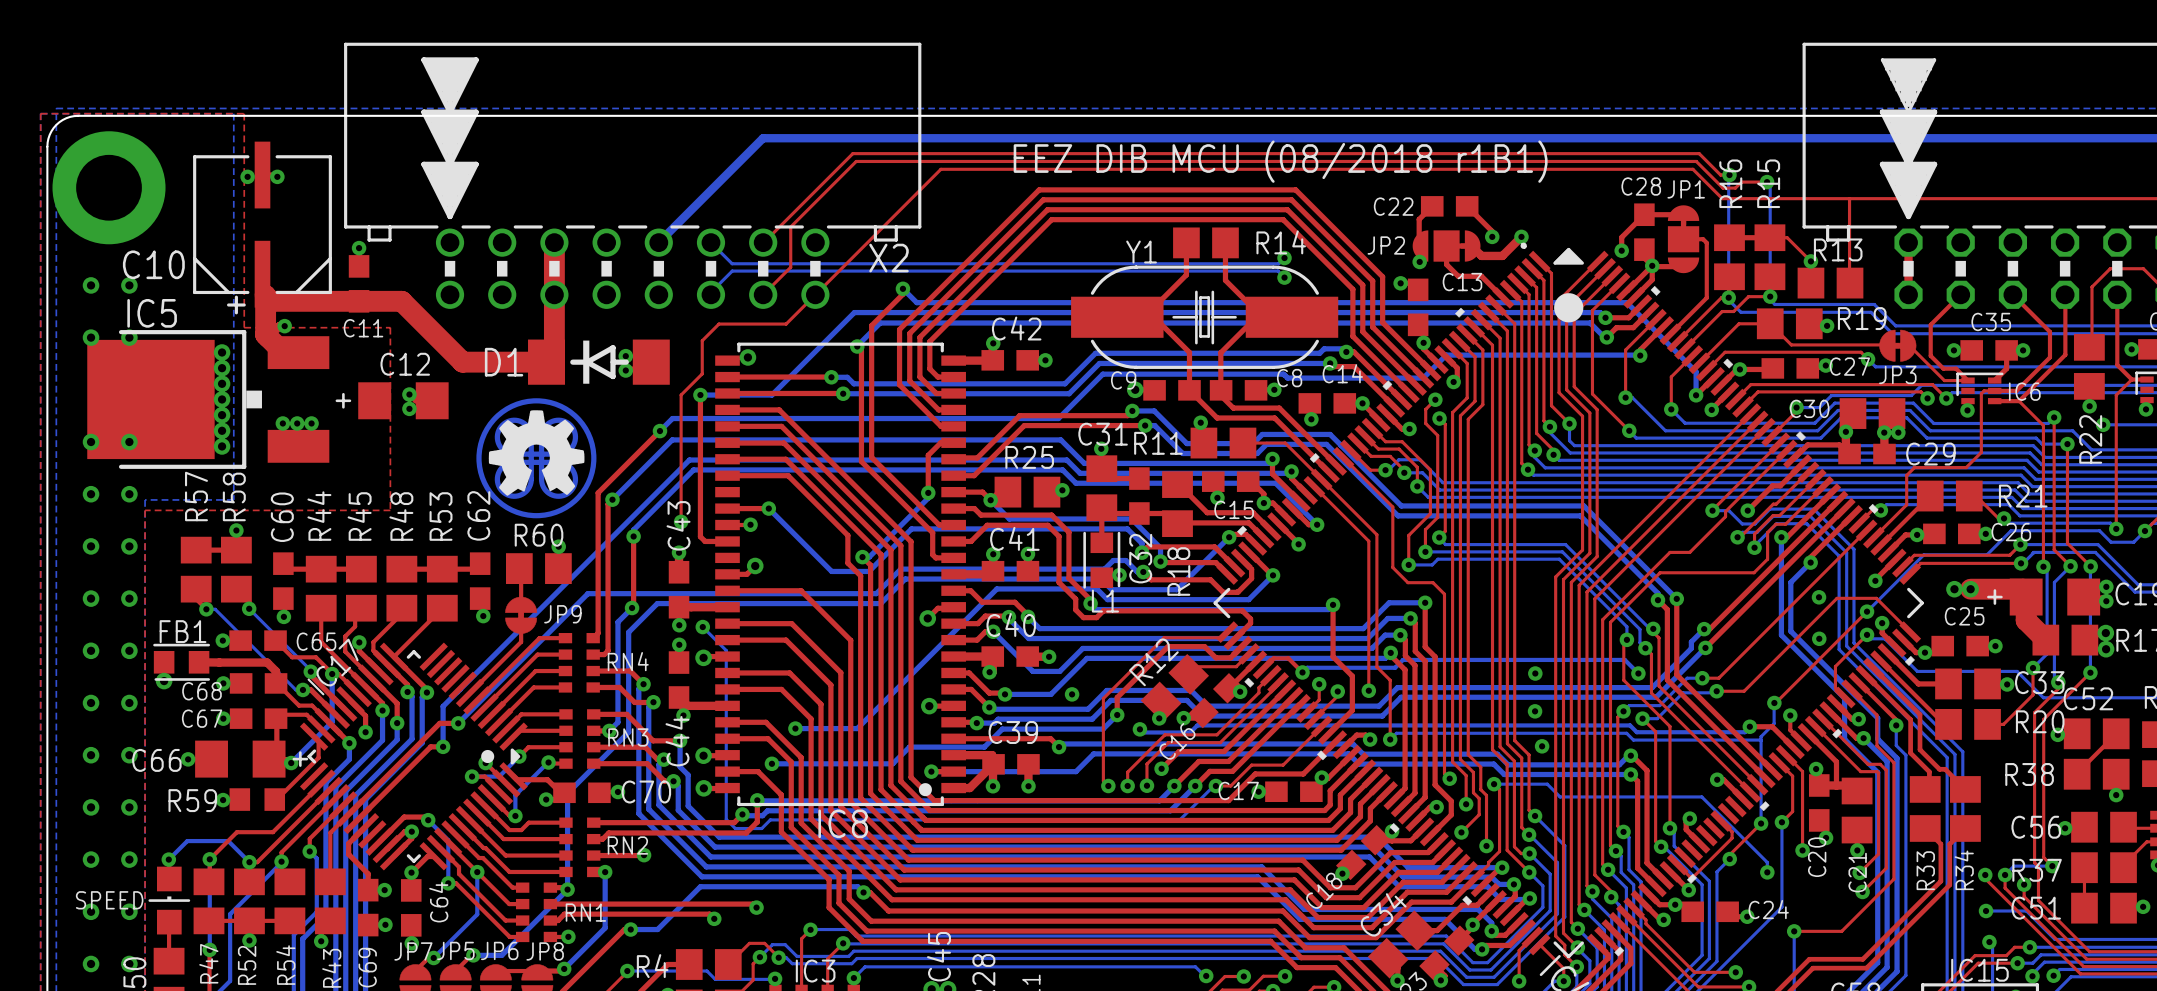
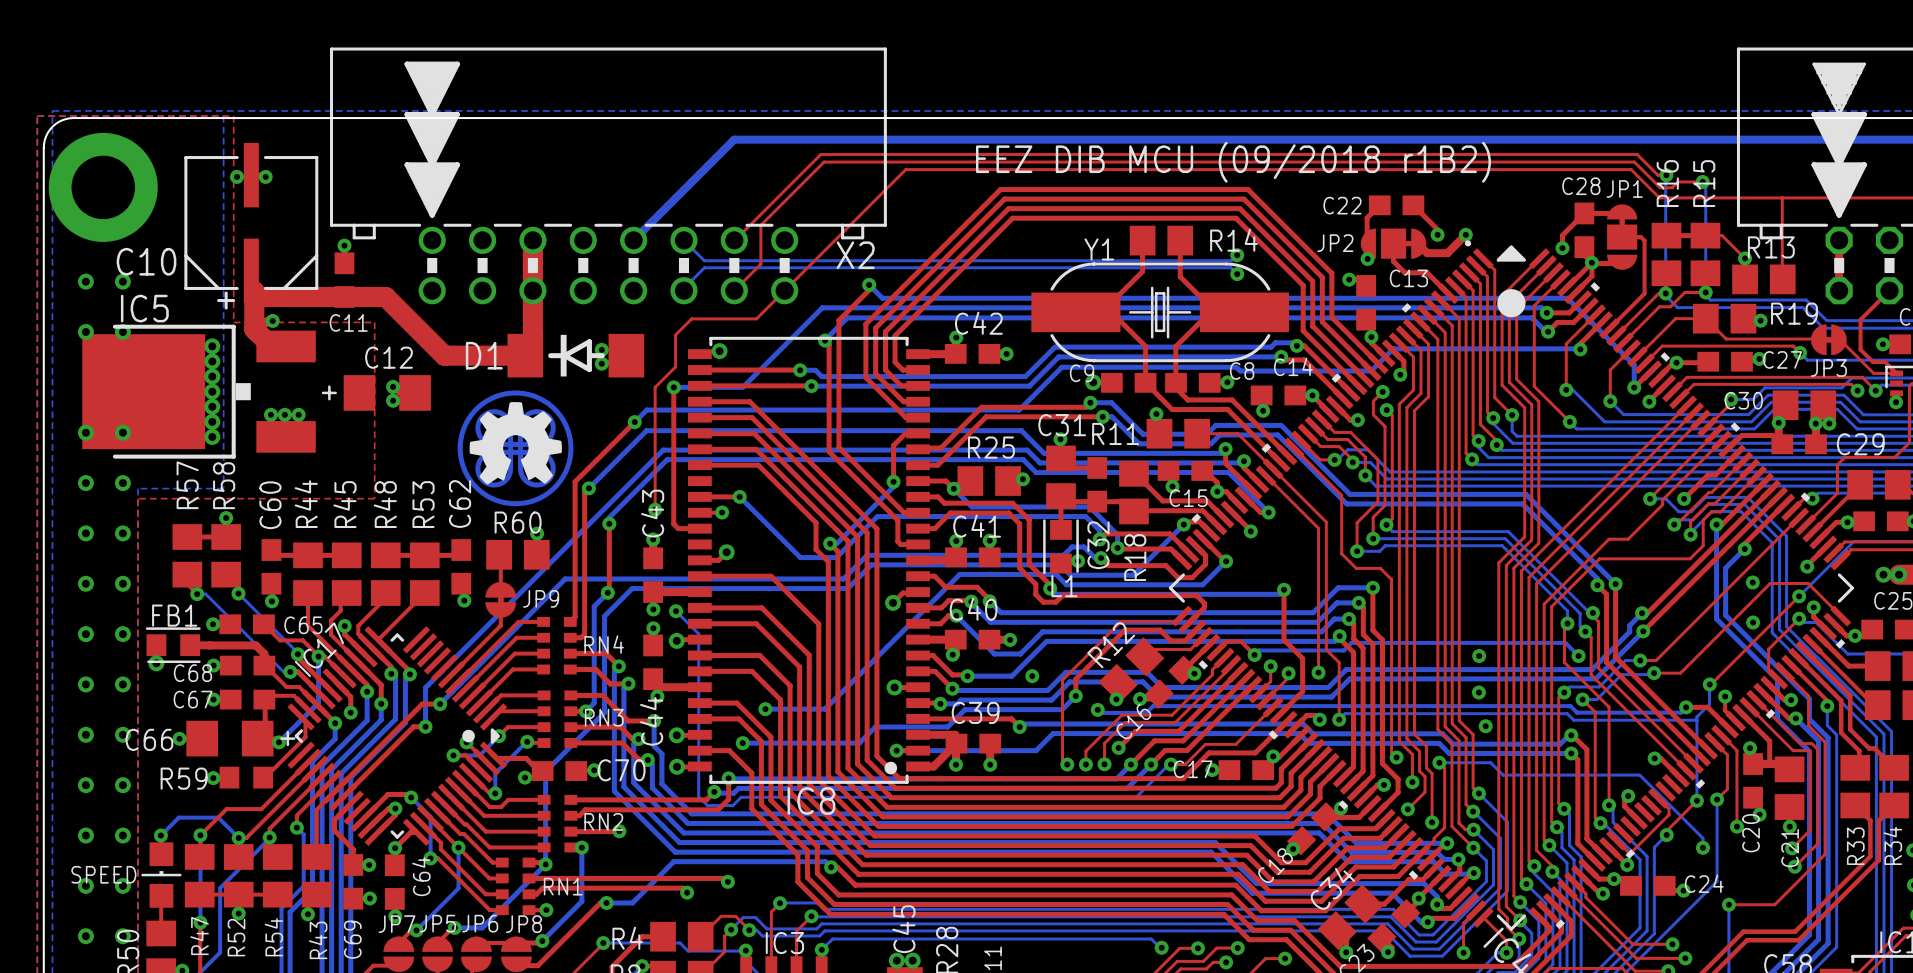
text: EEZ DIB MCU (08/2018 r1B1) (1280, 161) -> EEZ DIB MCU (09/2018 r1B2) (1233, 162)

